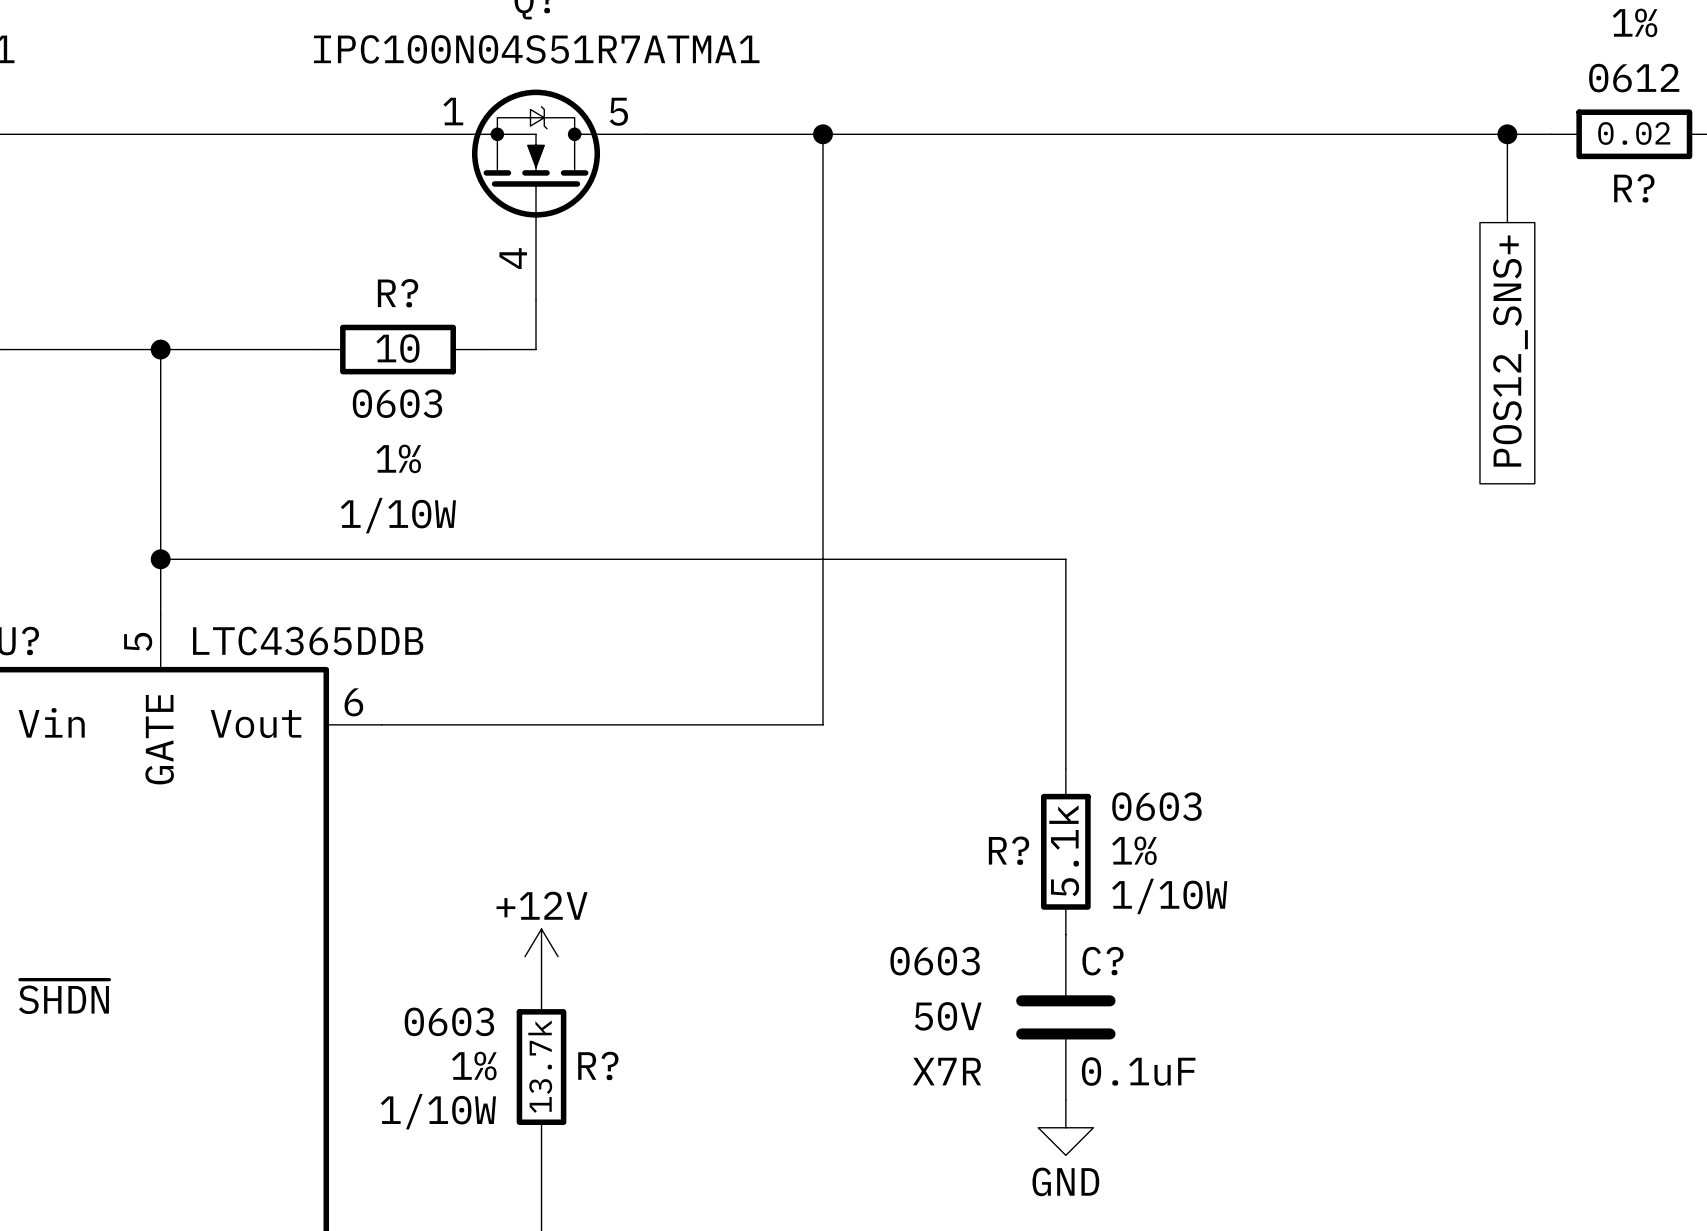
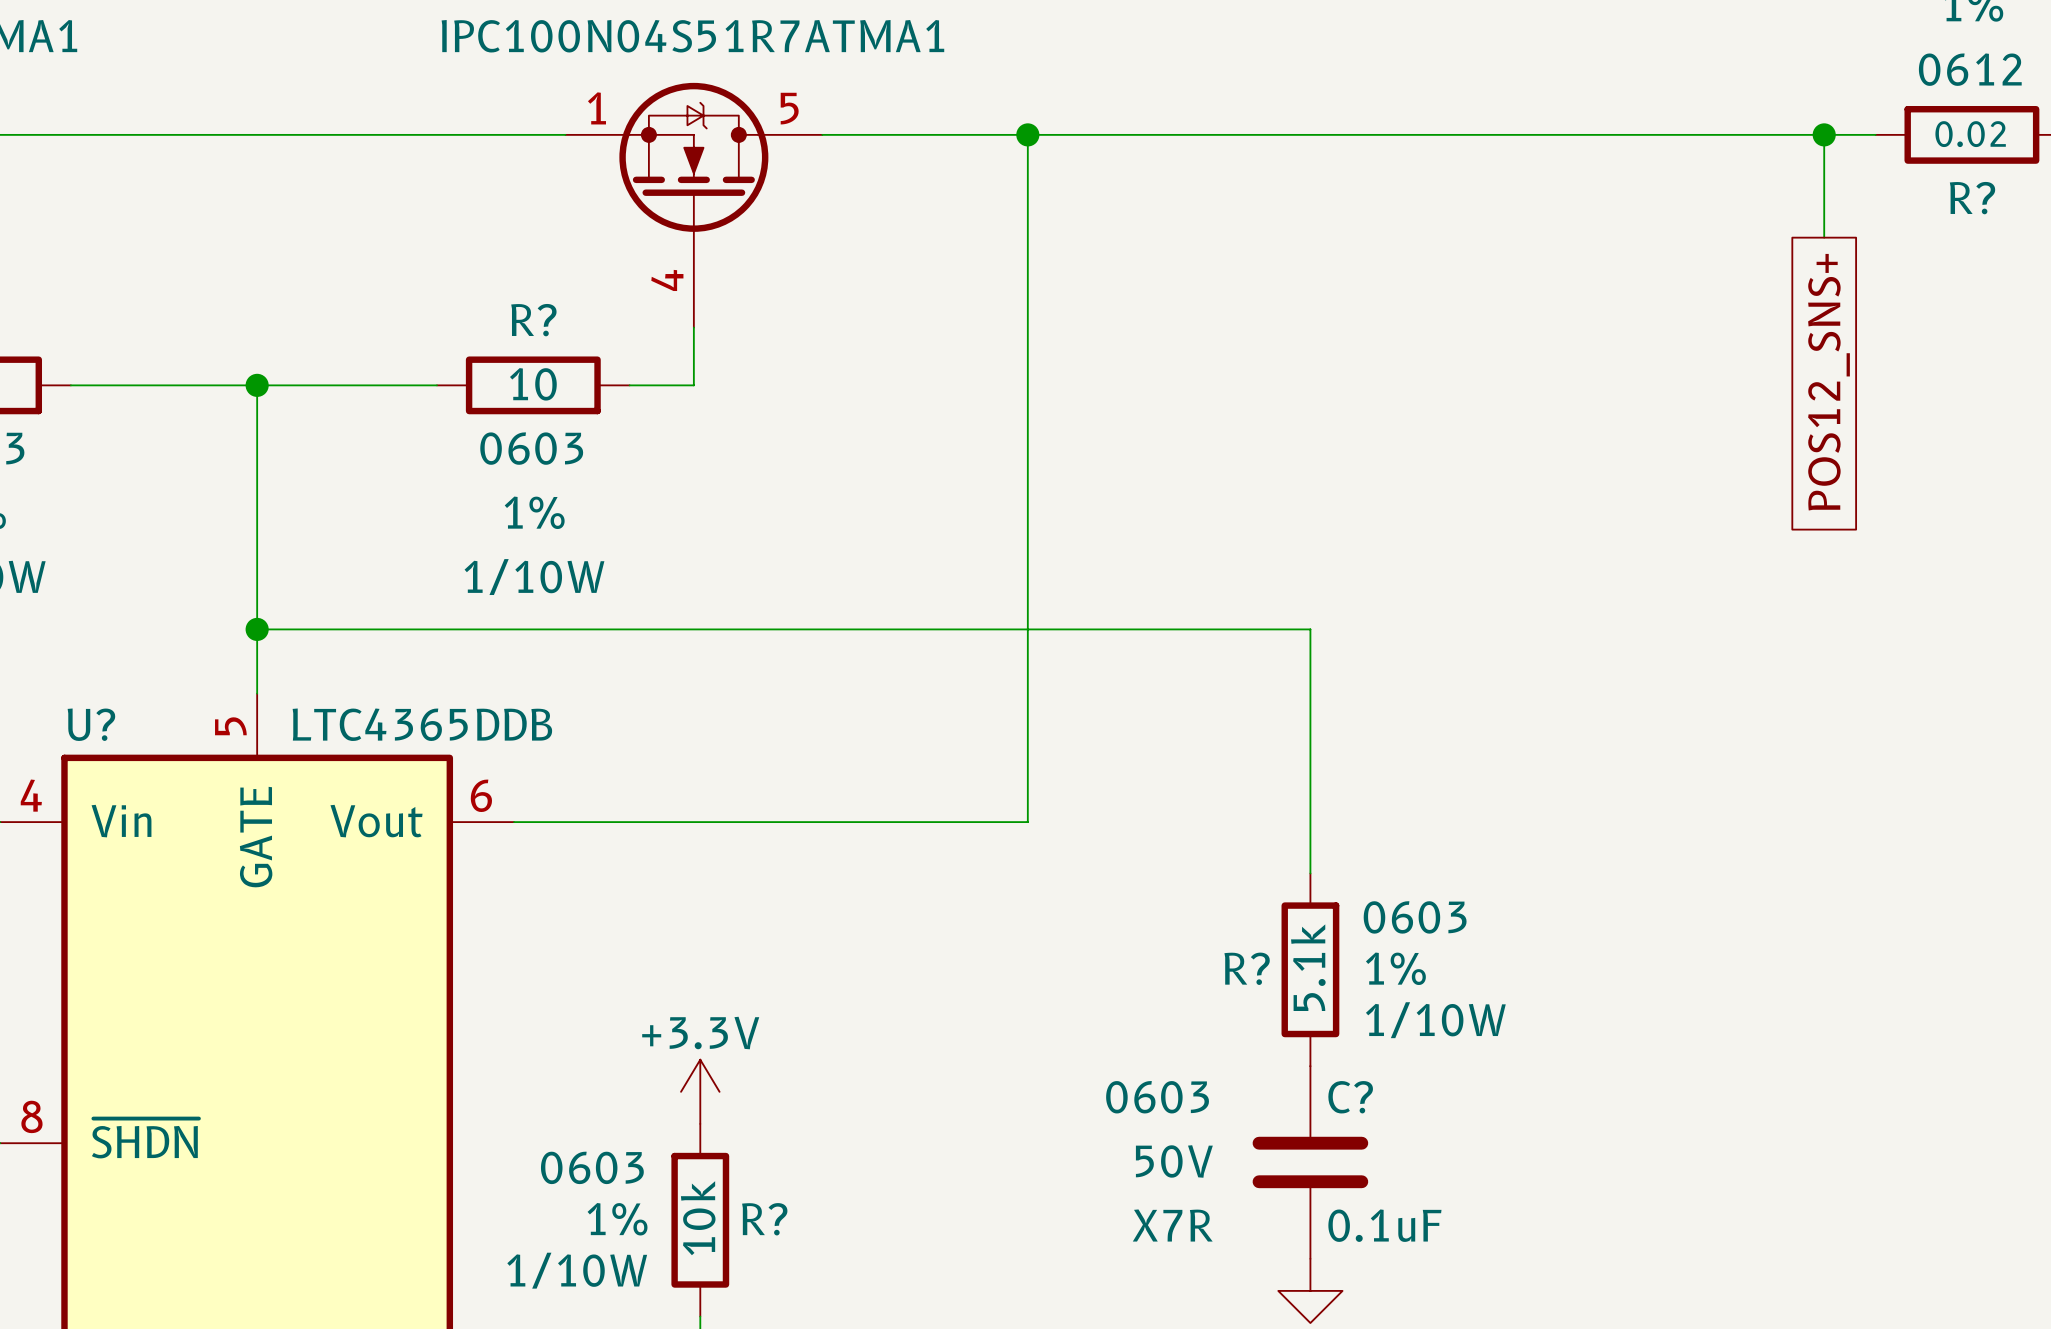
power symbol: +12V (541, 956) -> +3.3V (700, 1091)
R? value: 13.7k (540, 1066) -> 10k (698, 1218)

